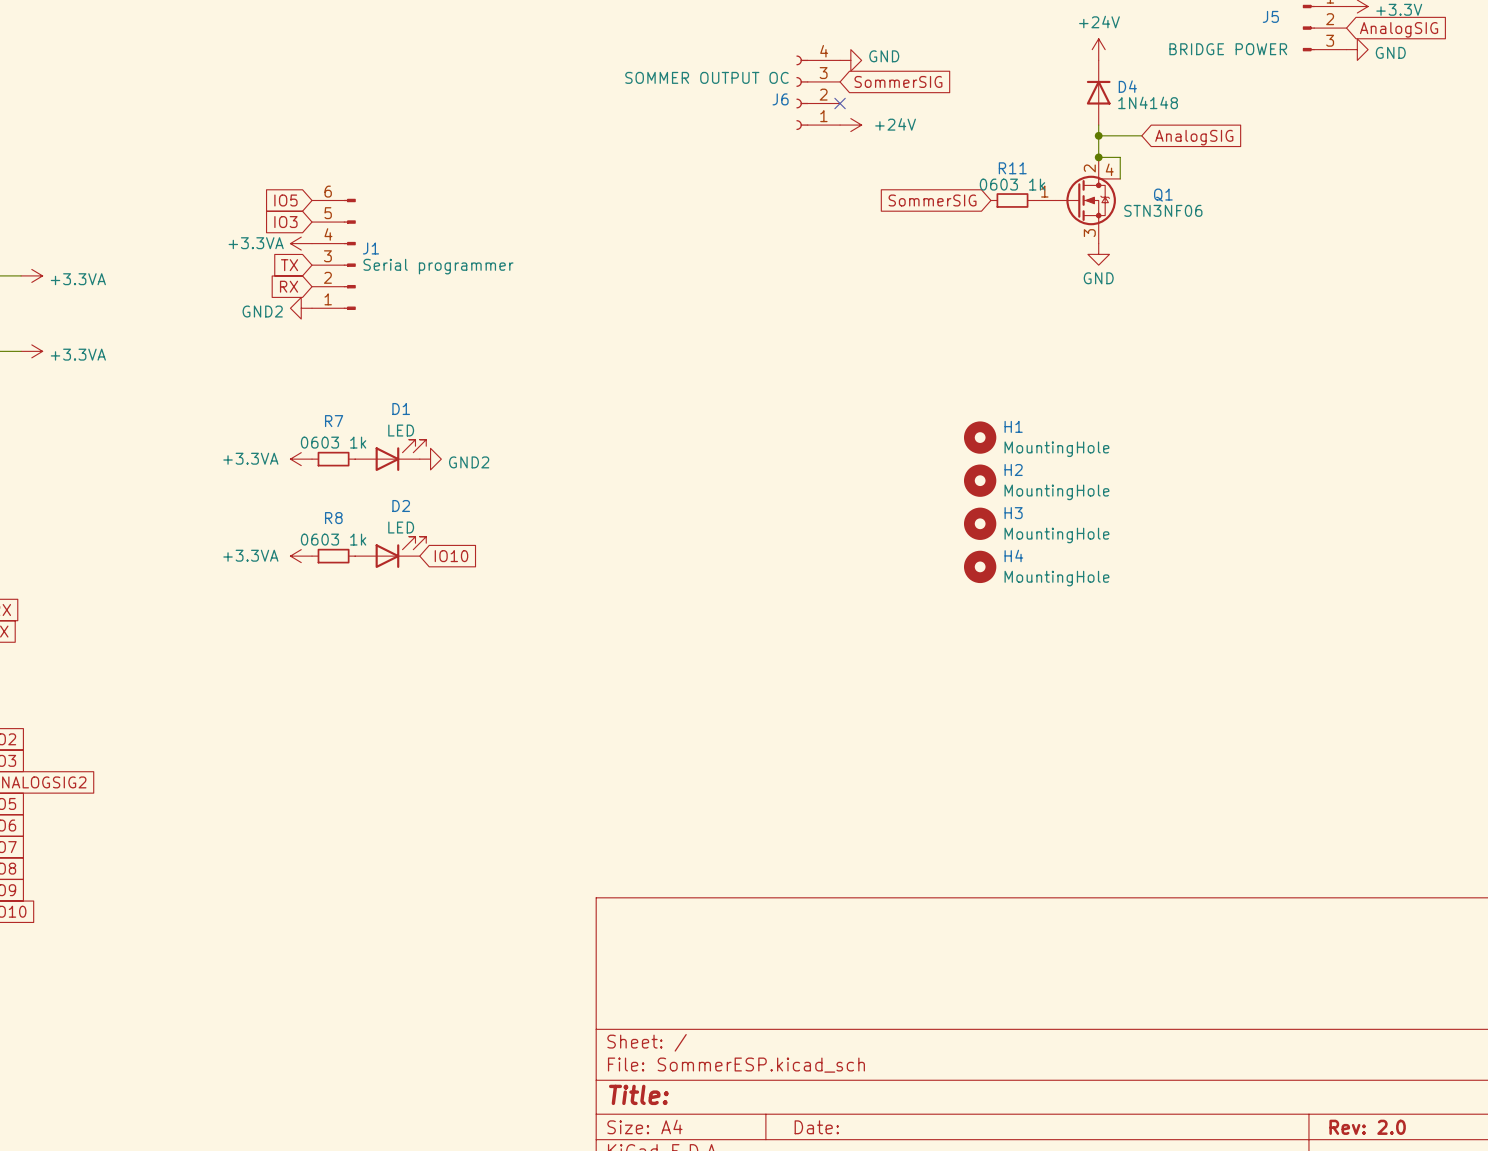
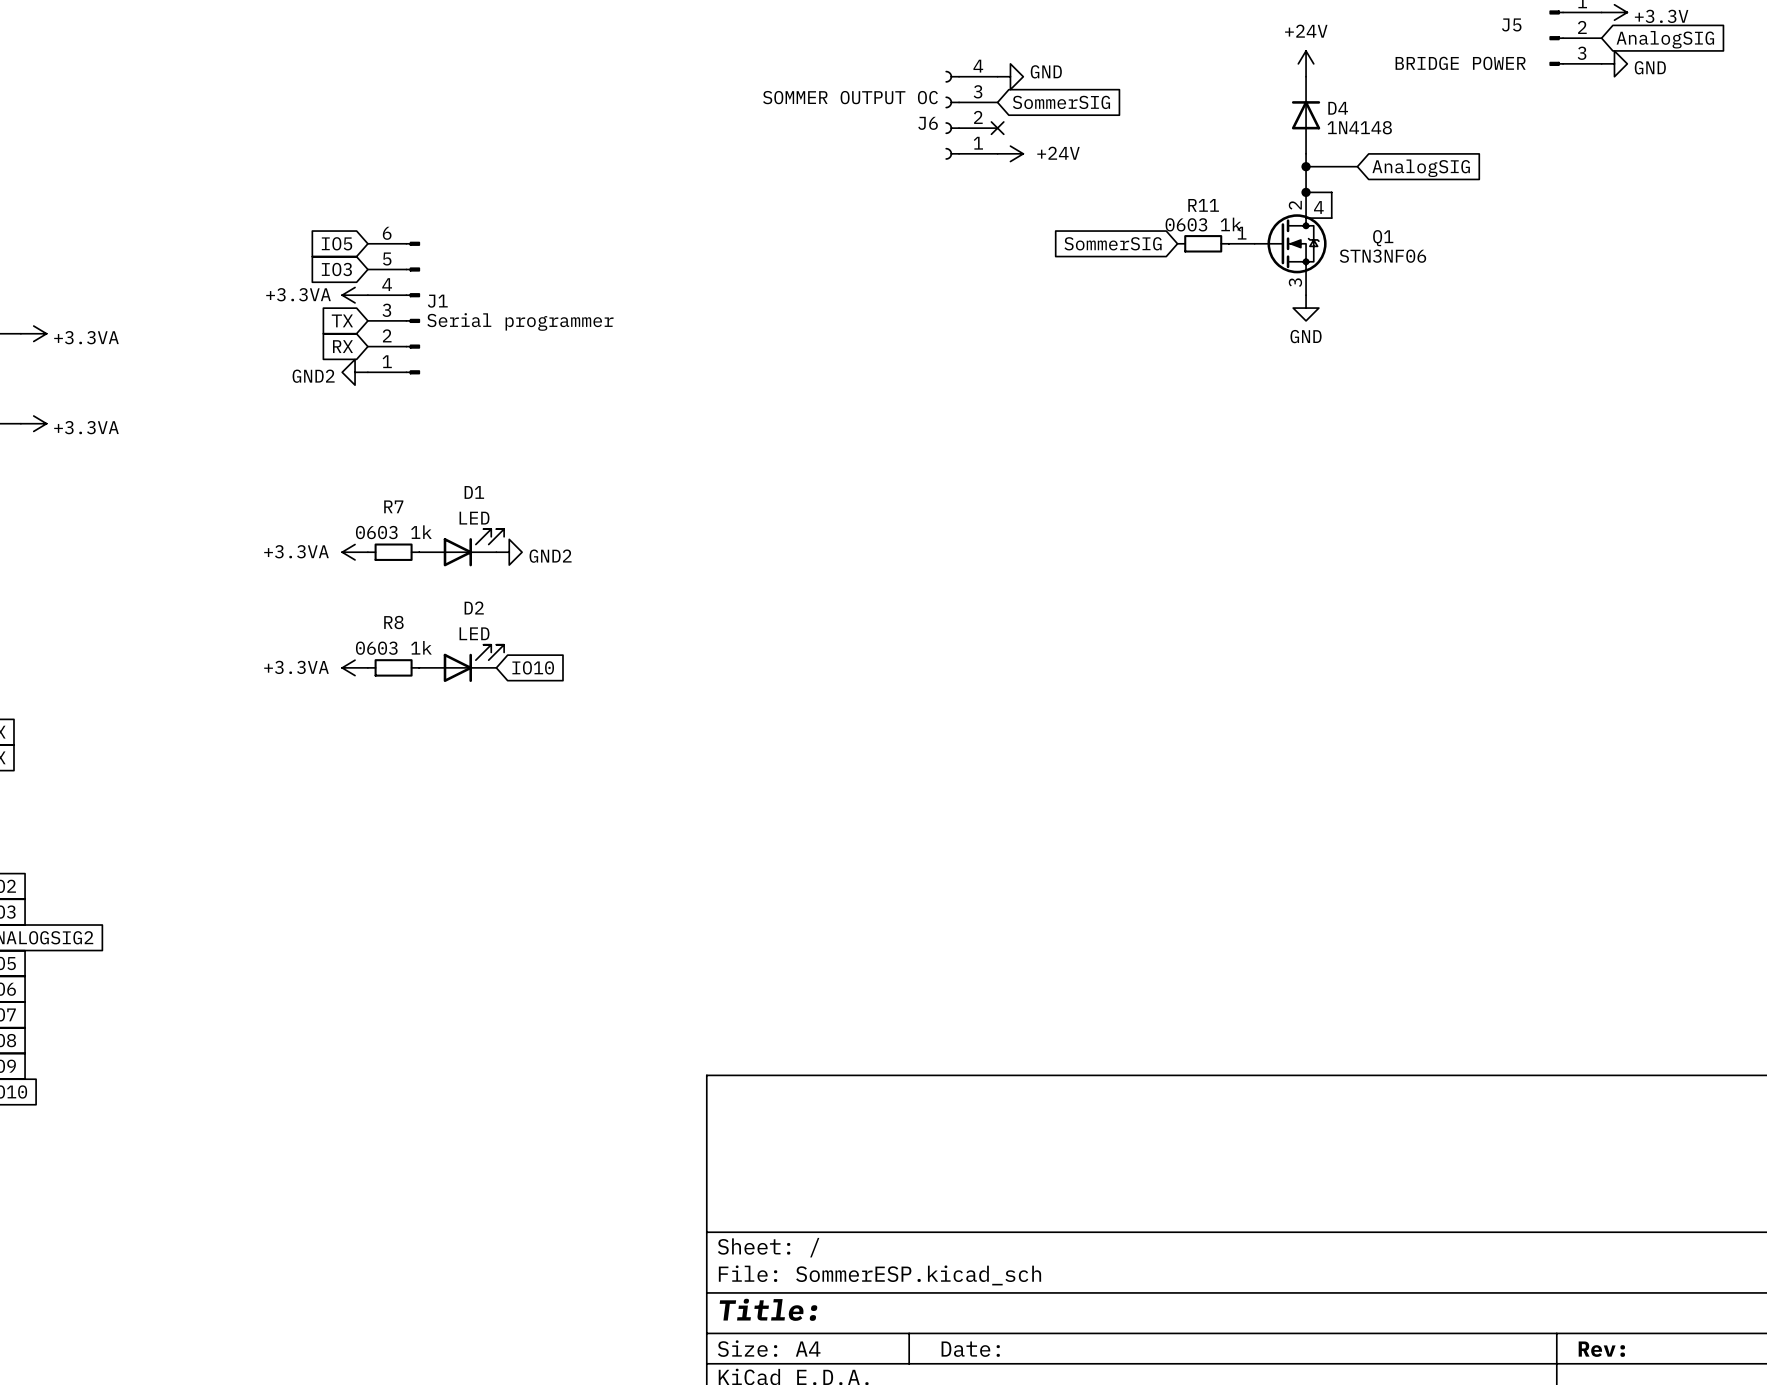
H1: MountingHole (980, 437) -> none
H2: MountingHole (980, 480) -> none
H3: MountingHole (980, 523) -> none
H4: MountingHole (980, 566) -> none
title block: Rev: 2.0 (1367, 1127) -> Rev: (1601, 1349)

